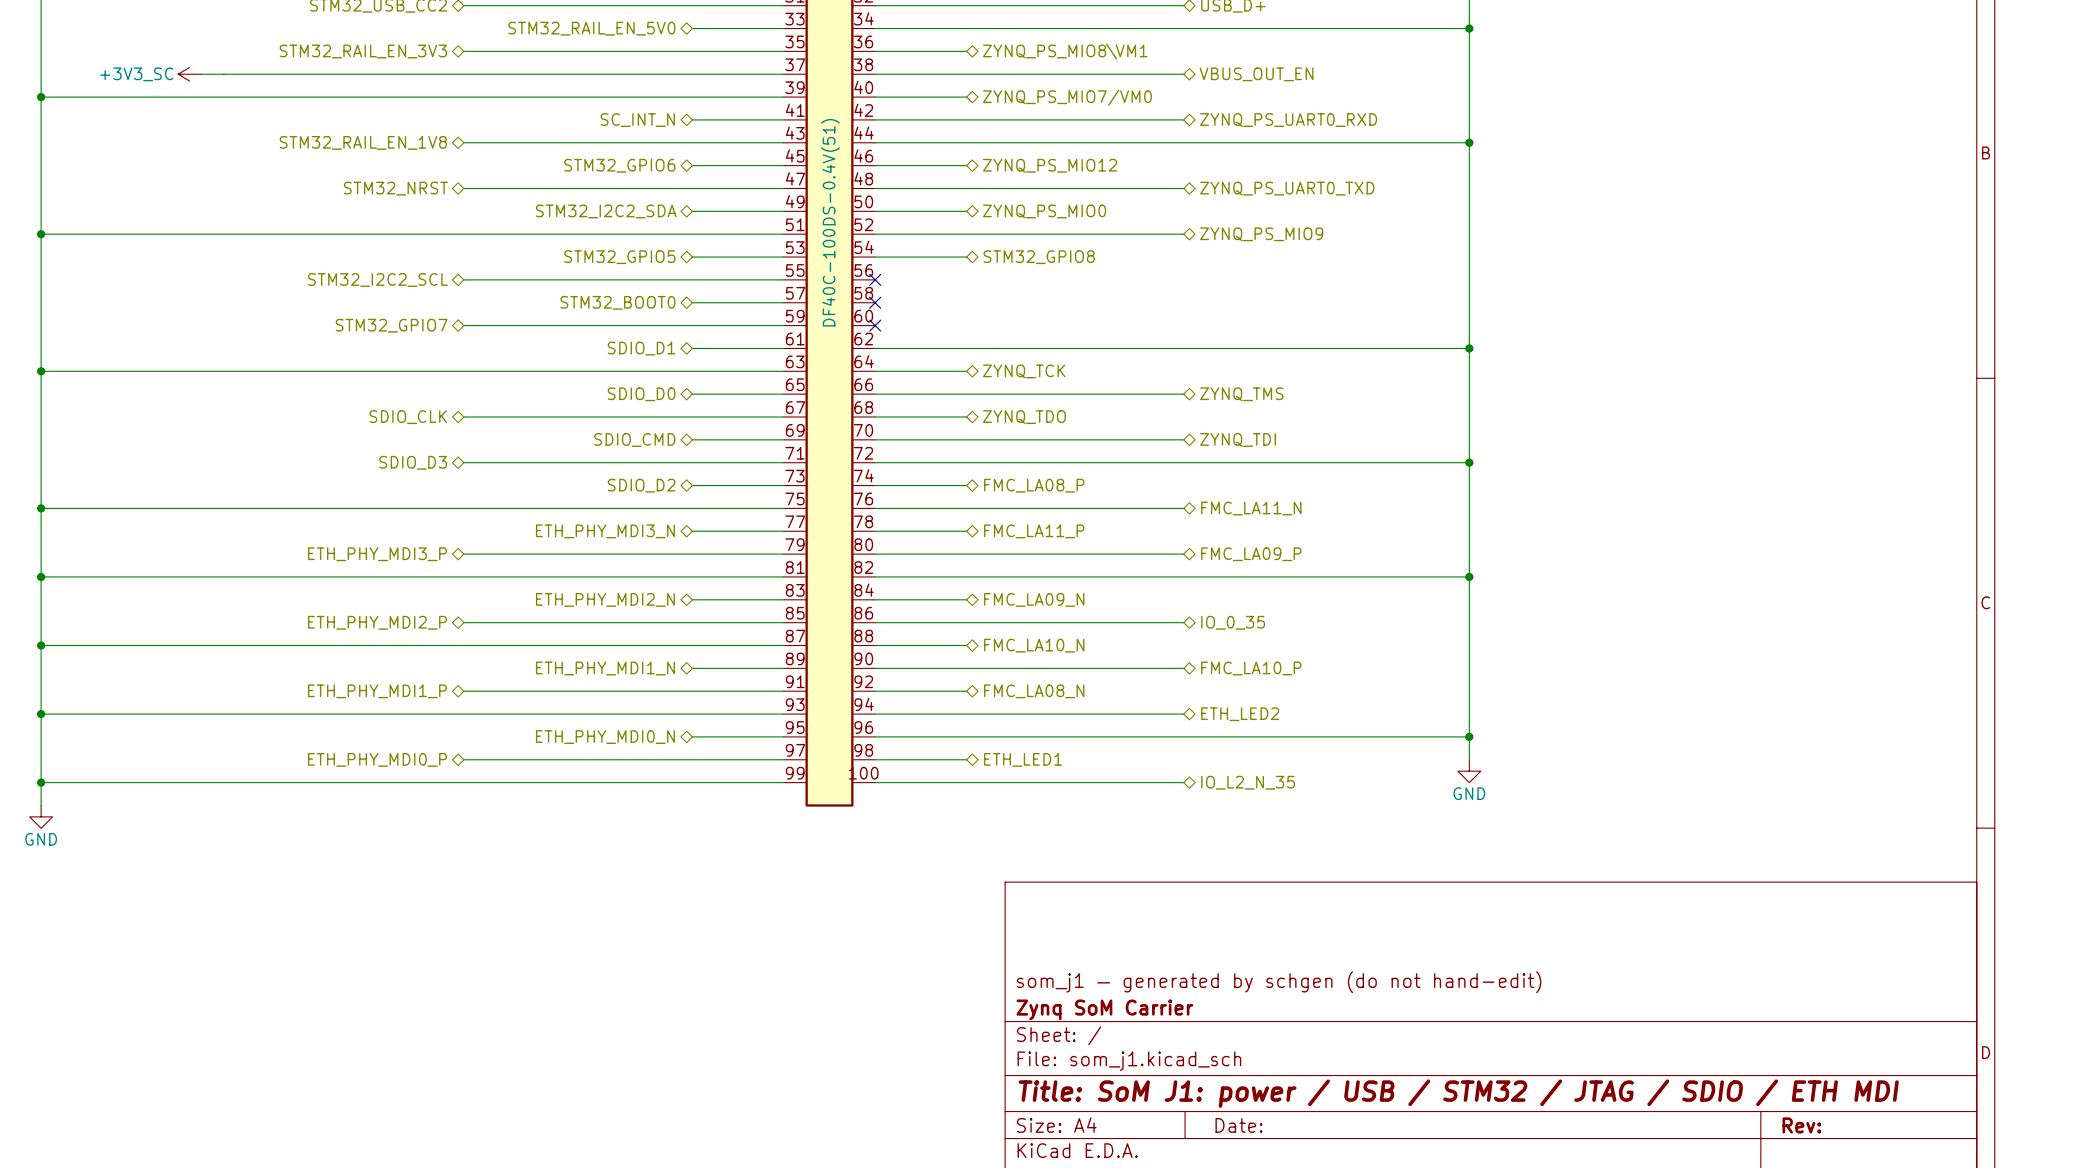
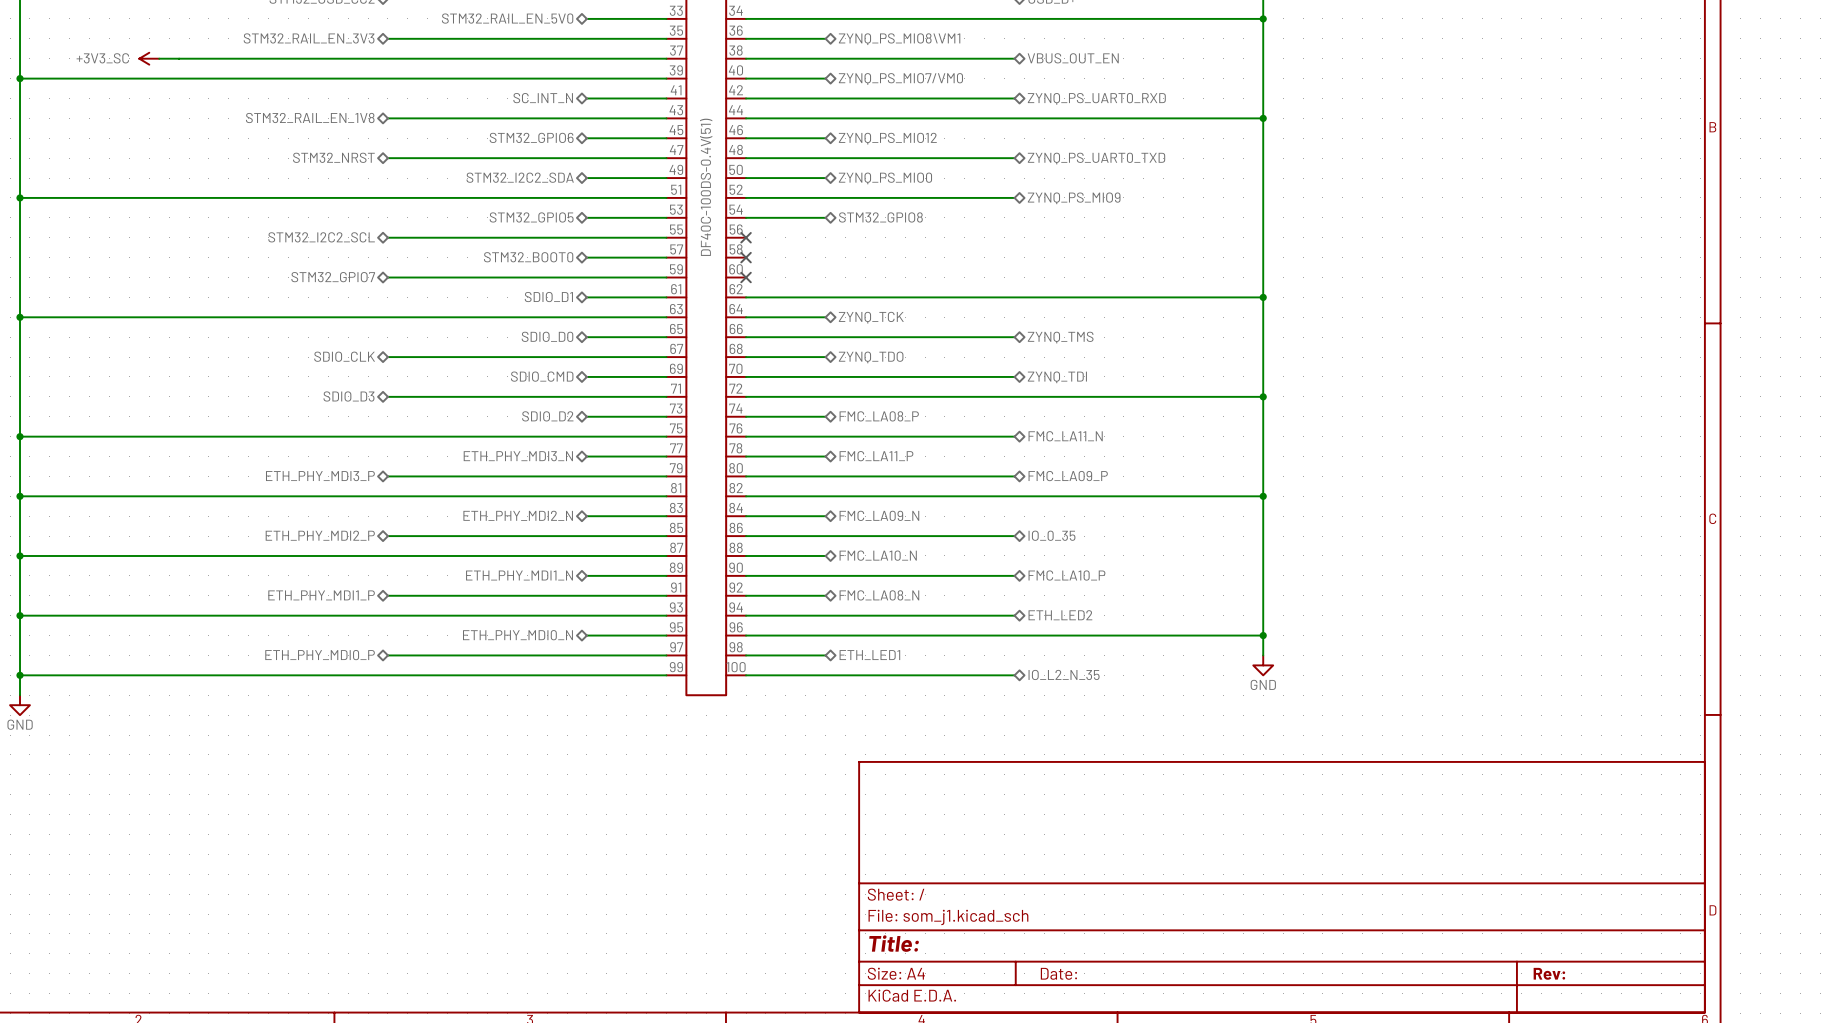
title block: som_j1 — generated by schgen (do not hand-edit) (1279, 982) -> none
title block: Zynq SoM Carrier (1104, 1009) -> none
title block: Title: SoM J1: power / USB / STM32 / JTAG / SDIO / ETH MDI (1458, 1093) -> Title: (894, 943)

